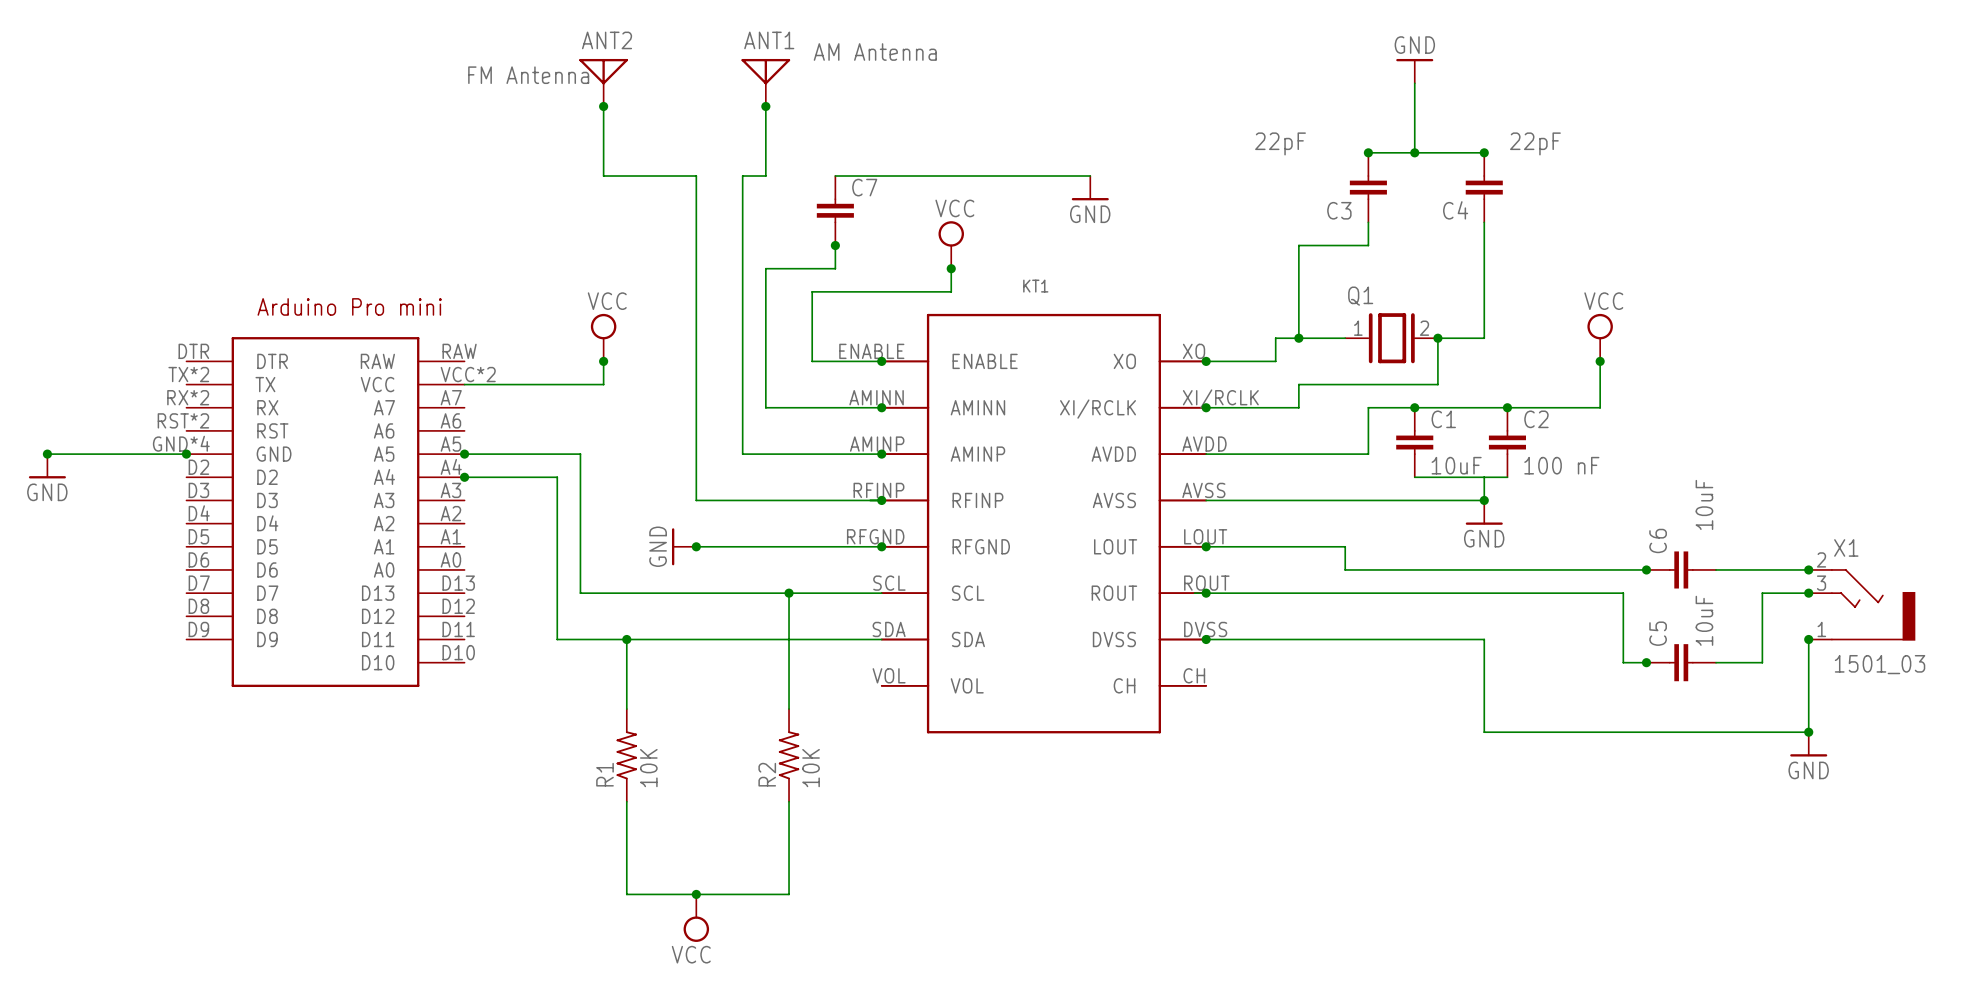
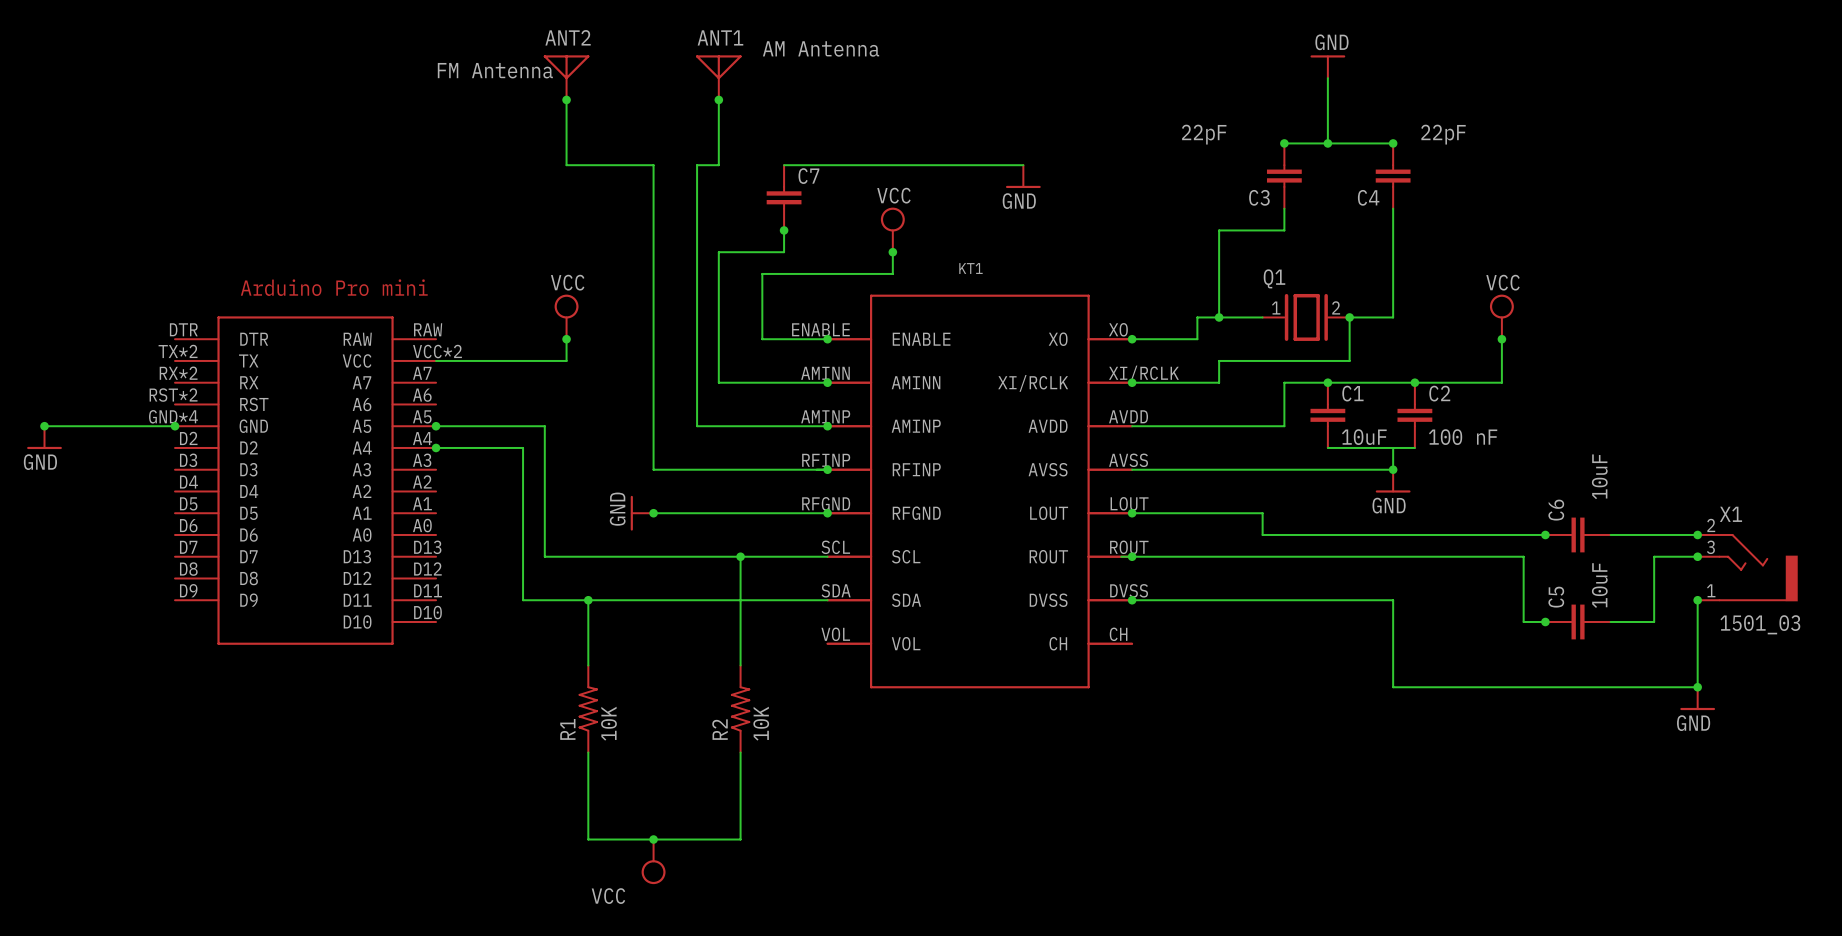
power symbol text position: VCC (691, 954) -> VCC (608, 896)

